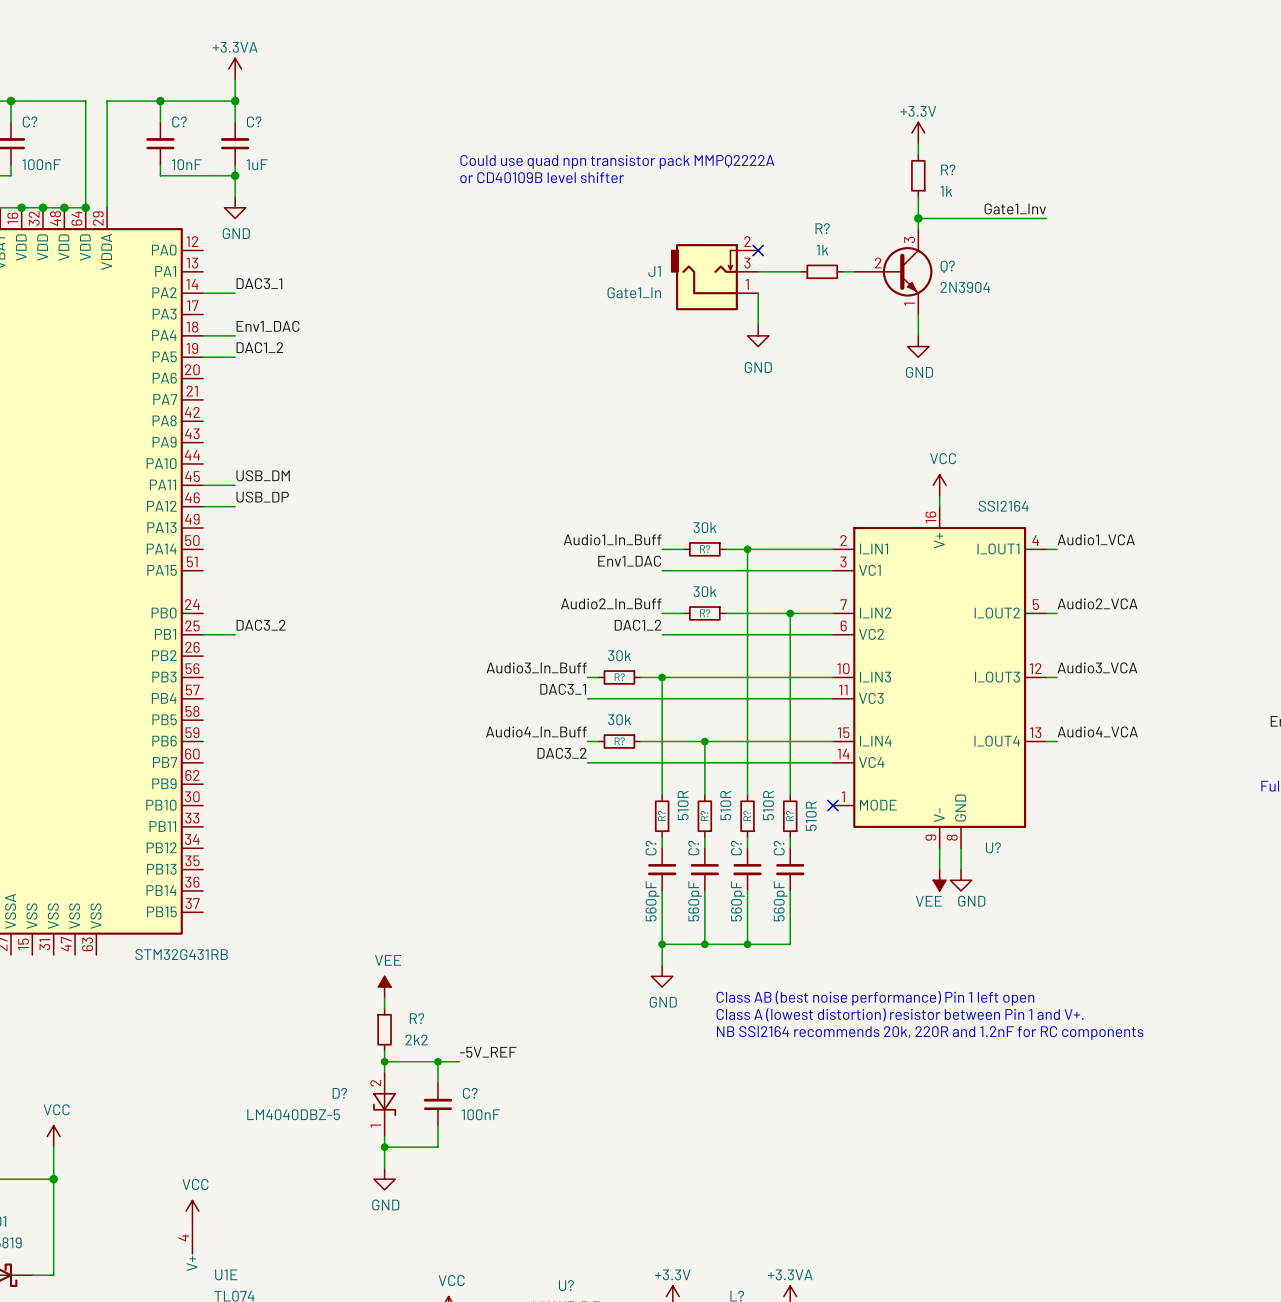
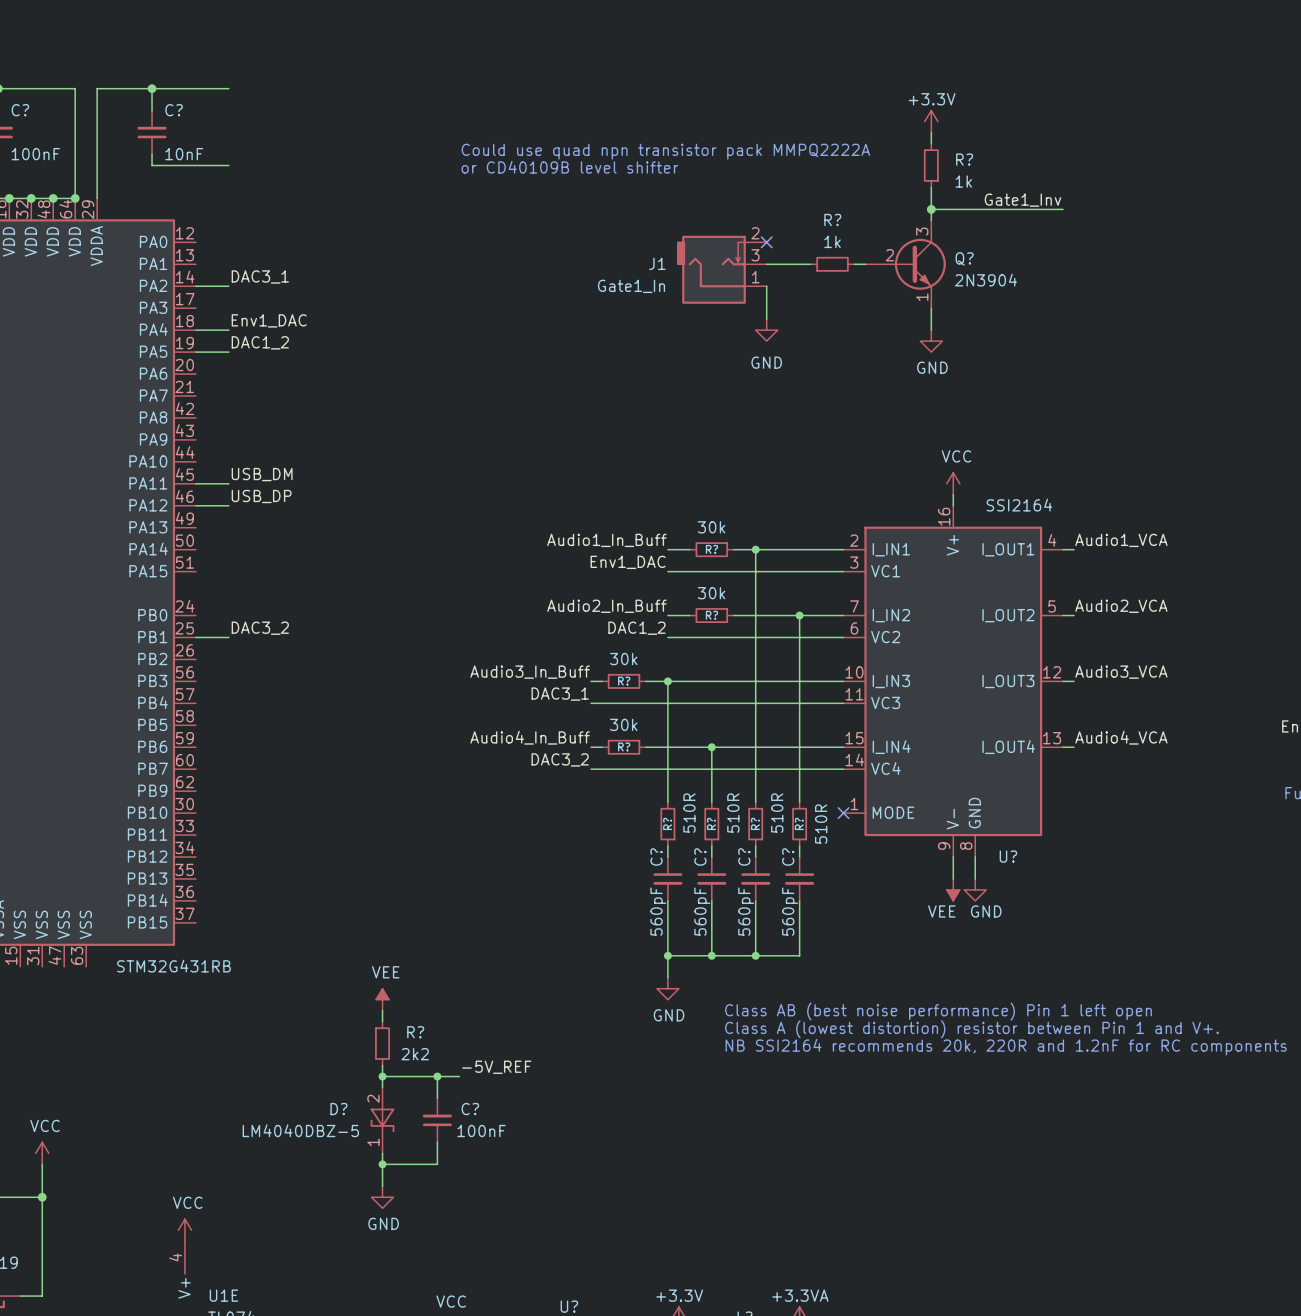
power symbol: +3.3VA (235, 69) -> none
wire: (235, 79) (235, 122) -> none
junction: (235, 101) -> none
C?: 1uF (235, 143) -> none
wire: (235, 165) (235, 197) -> none
junction: (235, 175) -> none
power symbol: GND (235, 207) -> none

